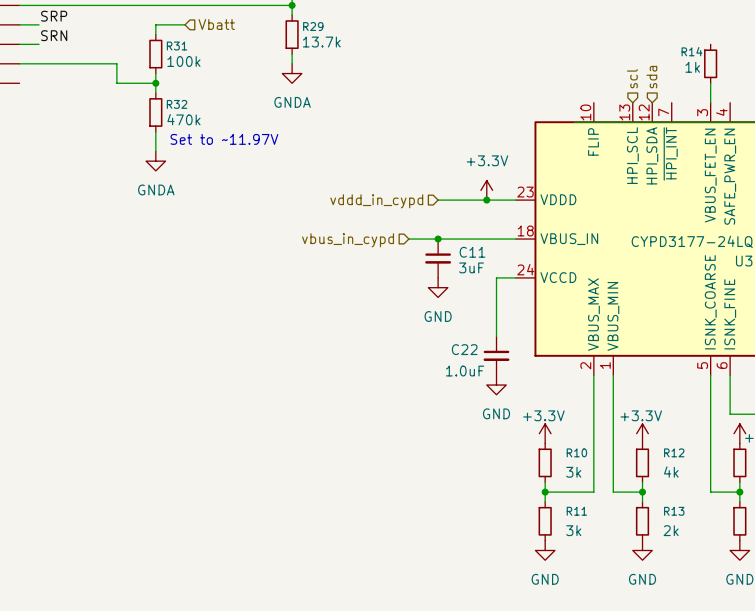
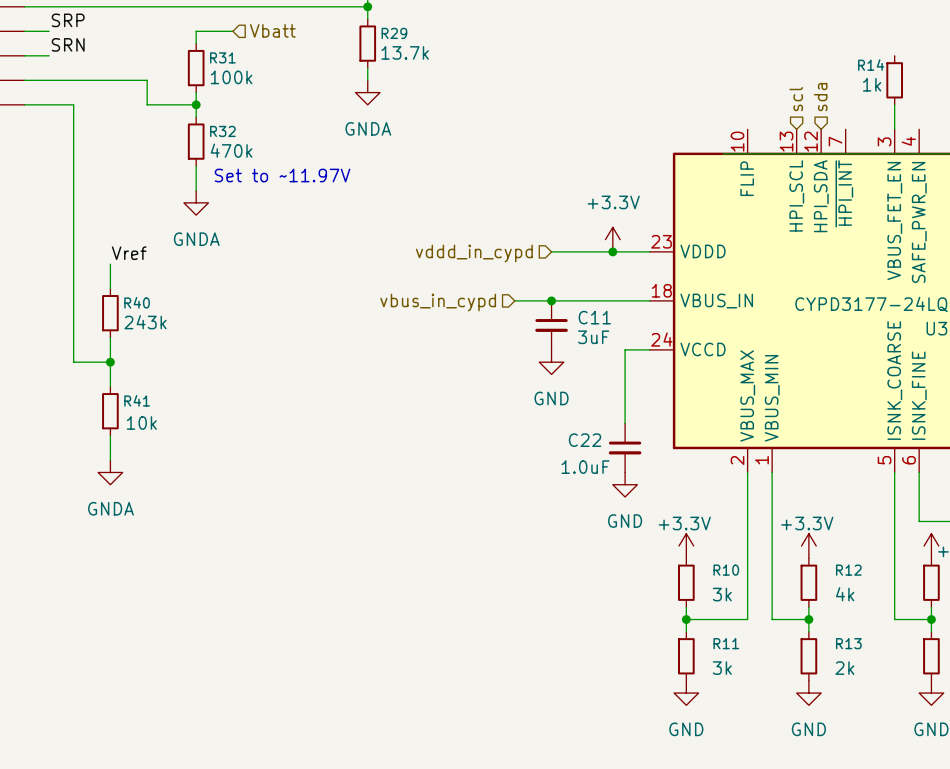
wire: none -> (24, 104) (73, 104) (73, 362) (110, 362)
label: none -> Vref (129, 253)
wire: none -> (110, 264) (110, 288)
R40: none -> 243k (110, 313)
wire: none -> (110, 337) (110, 386)
junction: none -> (110, 362)
R41: none -> 10k (110, 411)
wire: none -> (110, 435) (110, 460)
power symbol: none -> GNDA (110, 472)

